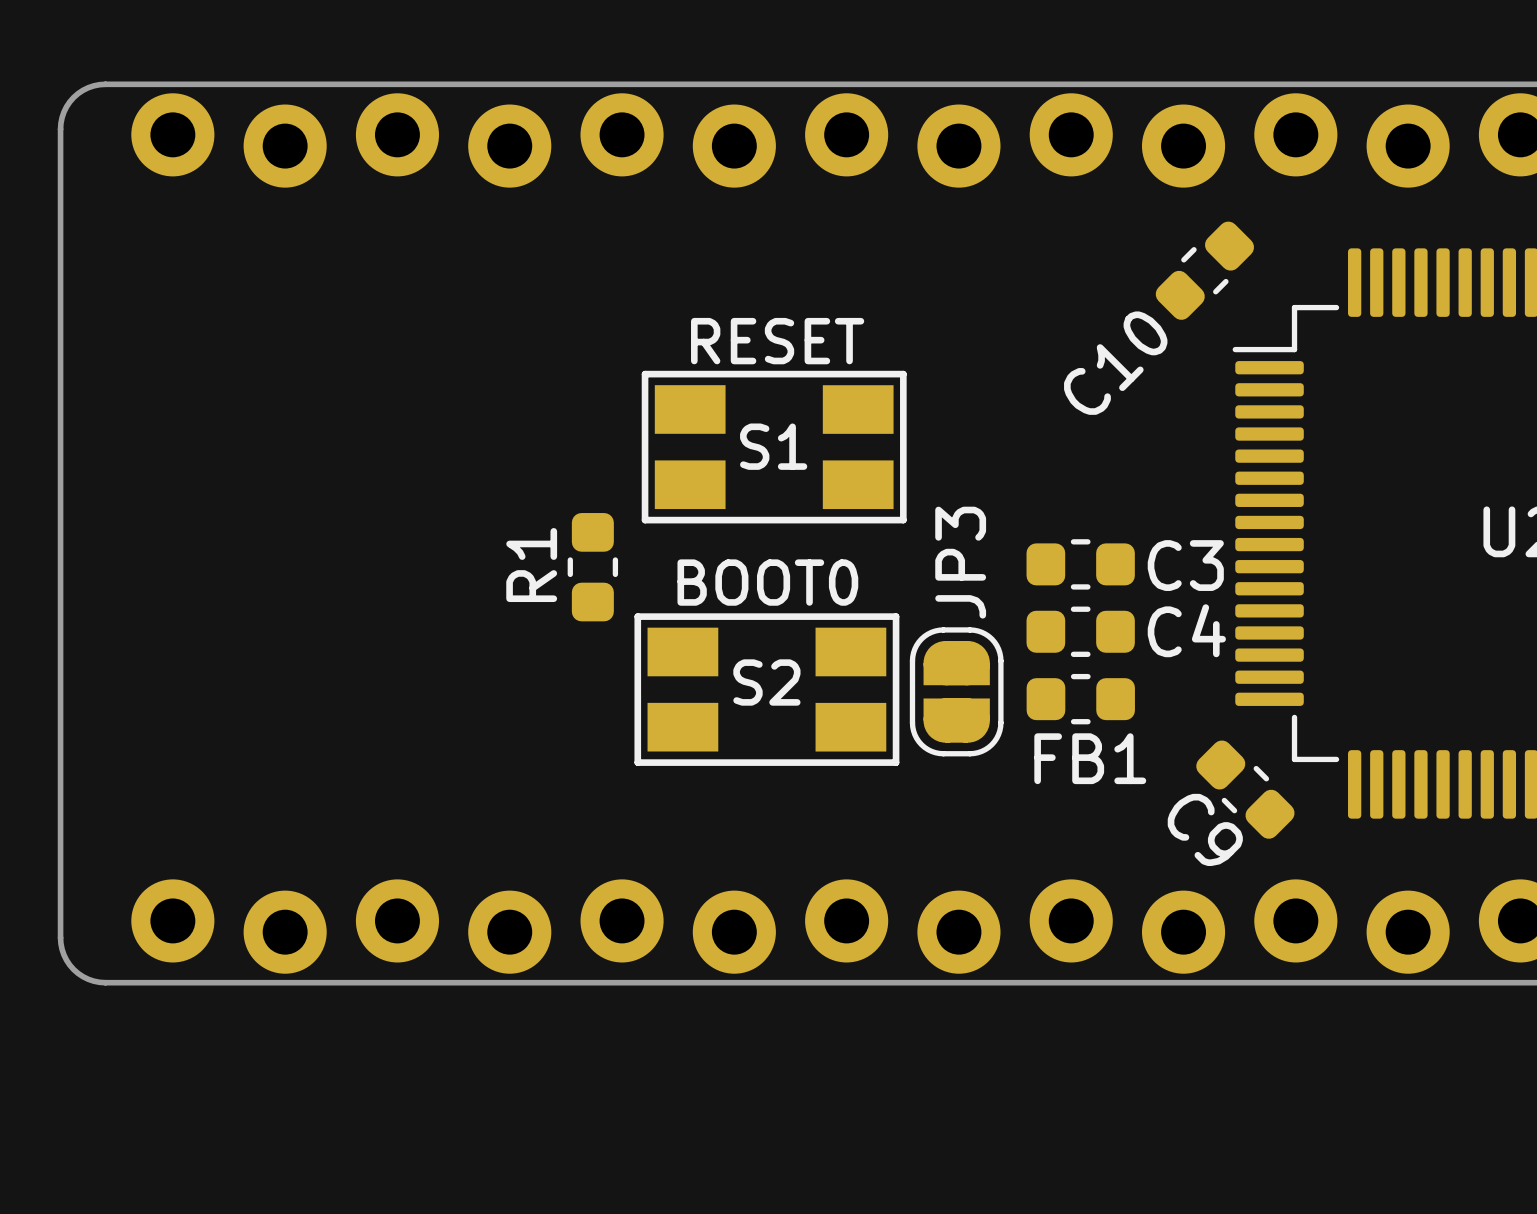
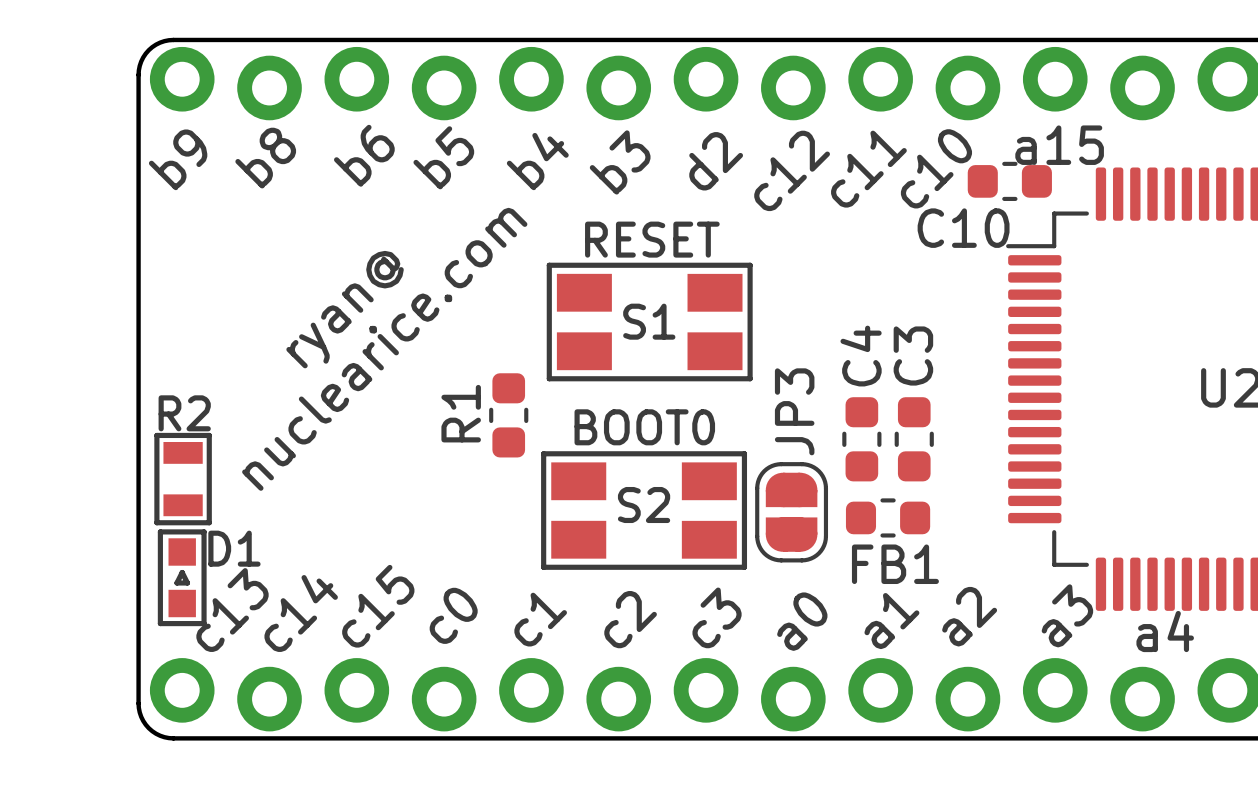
board edge: (161, 84) (105, 84) (88, 87) (78, 93) (69, 101) (63, 112) (60, 129) (60, 943) (63, 954) (69, 965) (78, 973) (88, 979) (105, 982) (161, 982) -> (173, 39) (160, 42) (148, 50) (141, 61) (138, 74) (138, 703) (141, 716) (148, 728) (160, 735) (173, 738)
text: none -> a15 (1059, 145)
text: none -> b6 (364, 155)
text: none -> b5 (443, 157)
text: none -> b8 (265, 158)
text: none -> b9 (178, 159)
text: none -> b4 (537, 161)
text: none -> d2 (716, 161)
text: none -> b3 (620, 162)
text: none -> c11 (868, 169)
text: none -> c10 (936, 168)
text: none -> c12 (792, 170)
C10 rotation: 0° (1204, 270) -> 45° clockwise (1009, 181)
text: none -> ryan@ (345, 309)
text: none -> nuclearice.com (384, 349)
C3 rotation: 0° (1080, 564) -> 90° clockwise (914, 439)
C3 name position: C3 (1185, 565) -> C3 (913, 356)
C4 name position: C4 (1186, 630) -> C4 (861, 356)
C4 rotation: 0° (1080, 631) -> 90° clockwise (861, 439)
R2: none -> (183, 479)
D1: none -> (182, 577)
C9: (1245, 789) -> none
text: none -> c15 (378, 606)
text: none -> c13 (232, 610)
text: none -> c14 (301, 613)
text: none -> c0 (453, 615)
text: none -> a3 (1067, 615)
text: none -> a2 (969, 616)
text: none -> c3 (717, 617)
text: none -> c1 (540, 619)
text: none -> c2 (630, 619)
text: none -> a1 (891, 621)
text: none -> a0 (802, 621)
text: none -> a4 (1165, 631)

